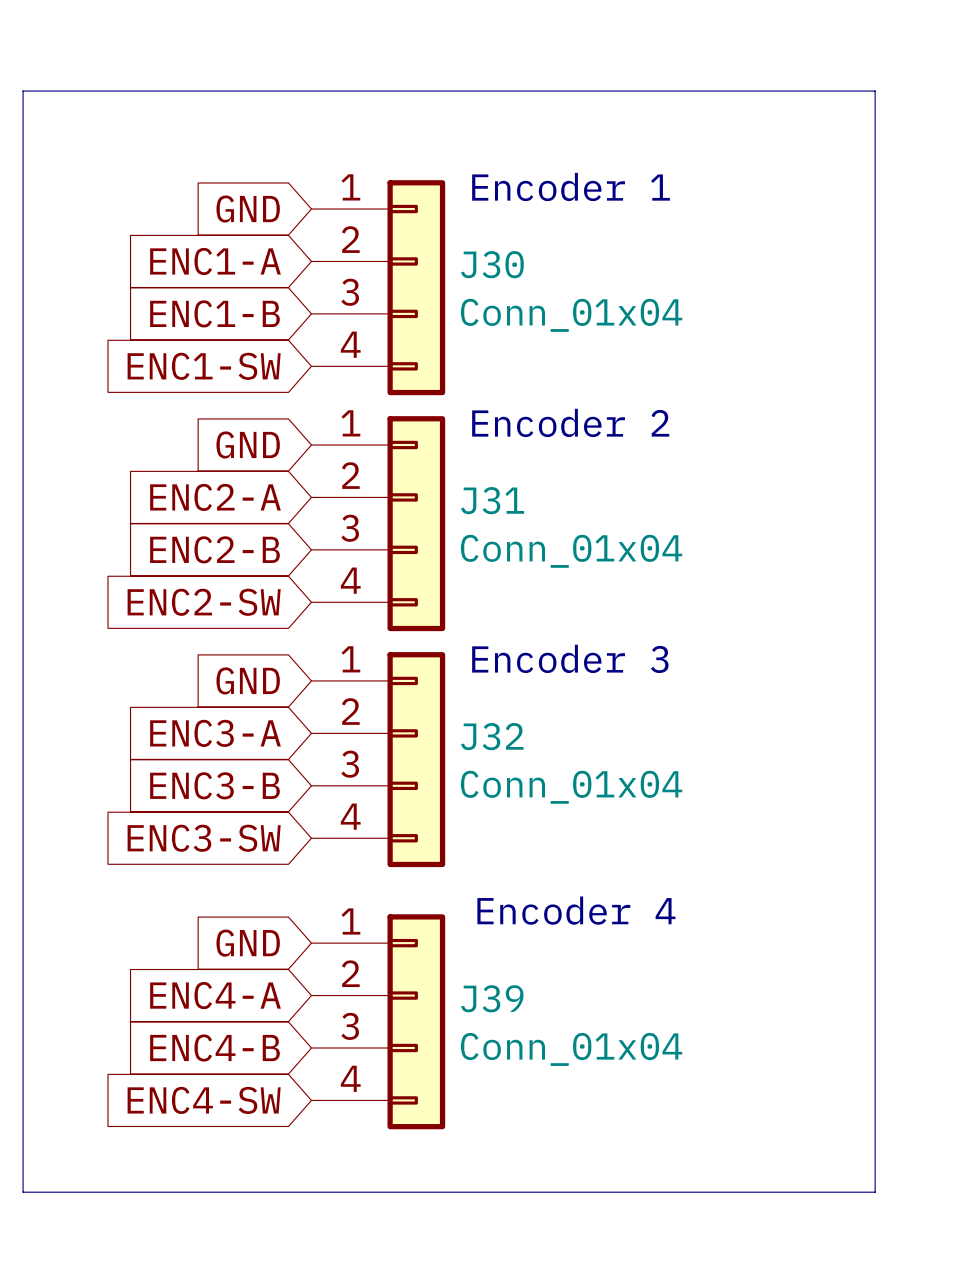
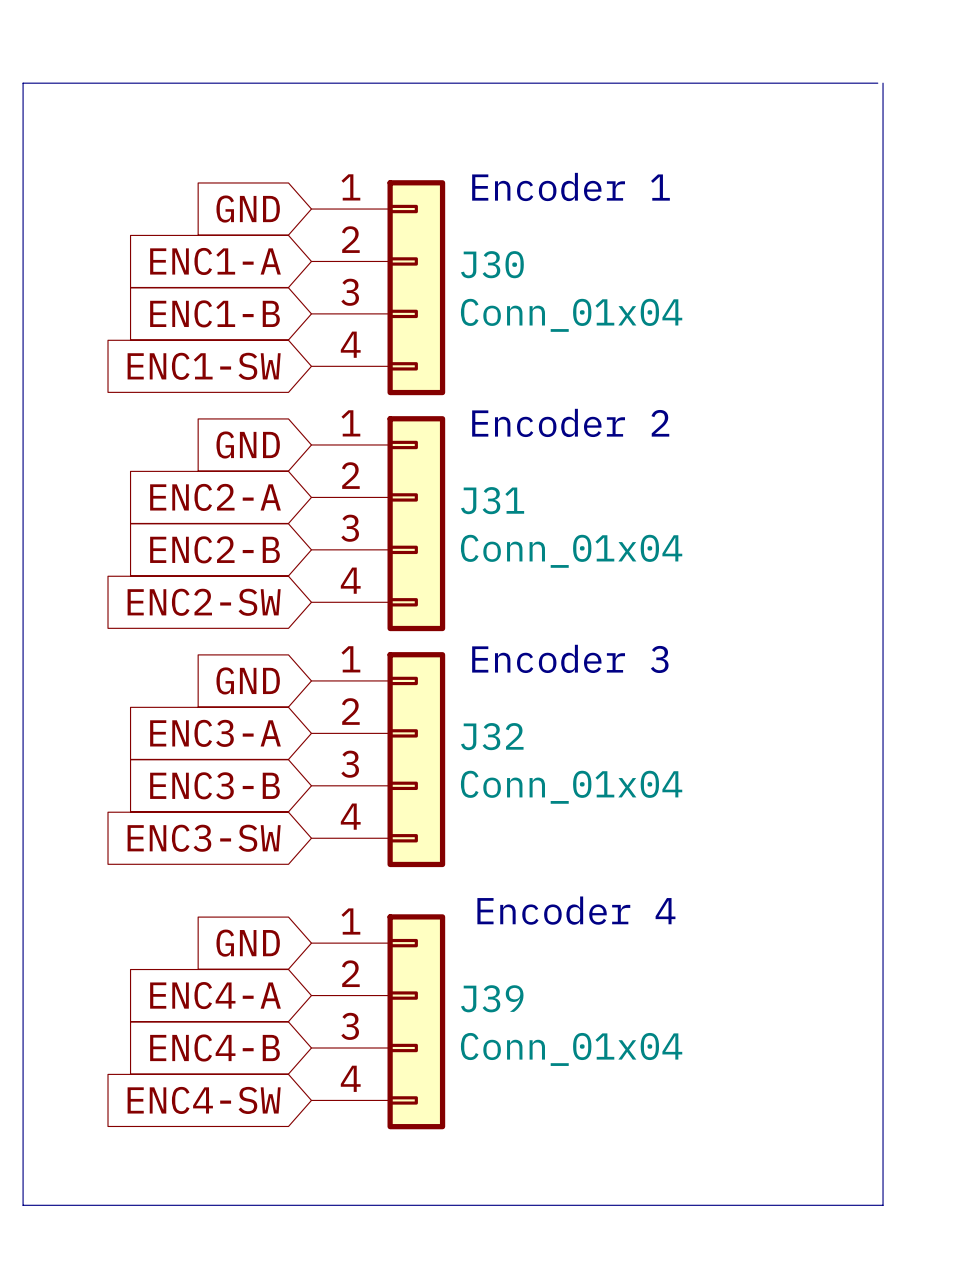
line: none -> (877, 83) (23, 83) (23, 91)
line: (23, 91) (875, 91) (875, 1192) (23, 1192) -> (883, 83) (883, 1205) (23, 1205) (23, 1192)

